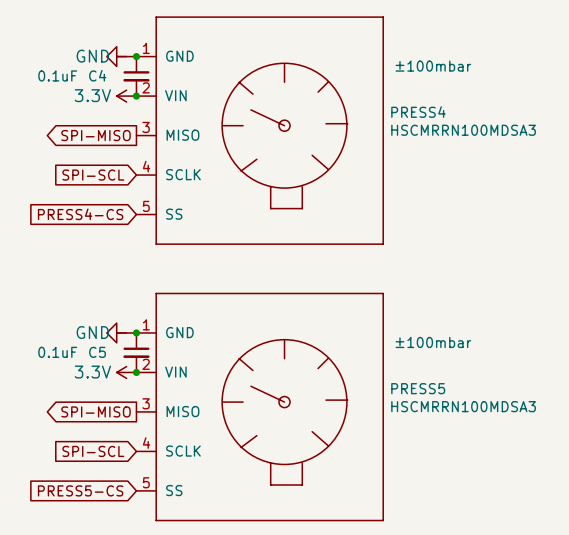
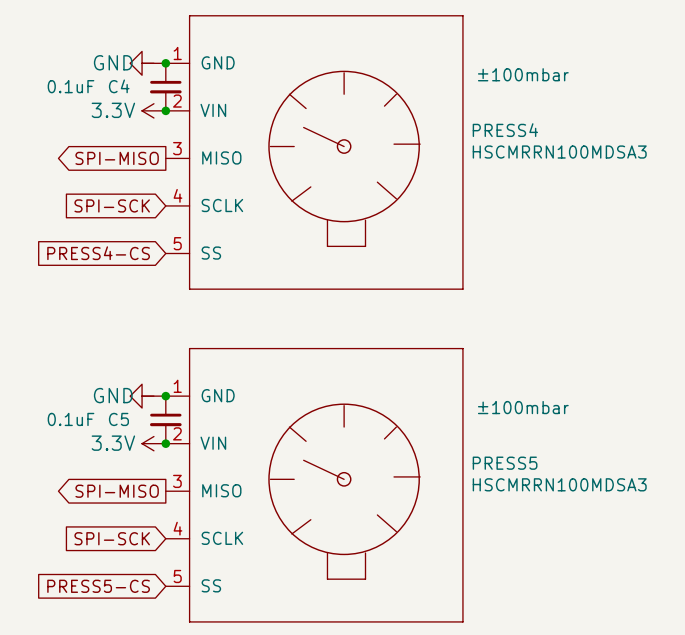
global label: SPI-SCL (93, 175) -> SPI-SCK (112, 205)
global label: SPI-SCL (93, 451) -> SPI-SCK (112, 538)

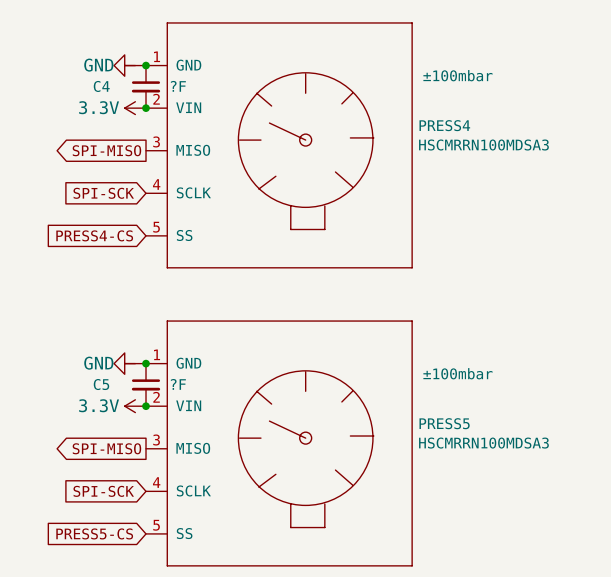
C4 text: 0.1uF (71, 86) -> ?F (178, 86)
C5 text: 0.1uF (71, 419) -> ?F (178, 384)

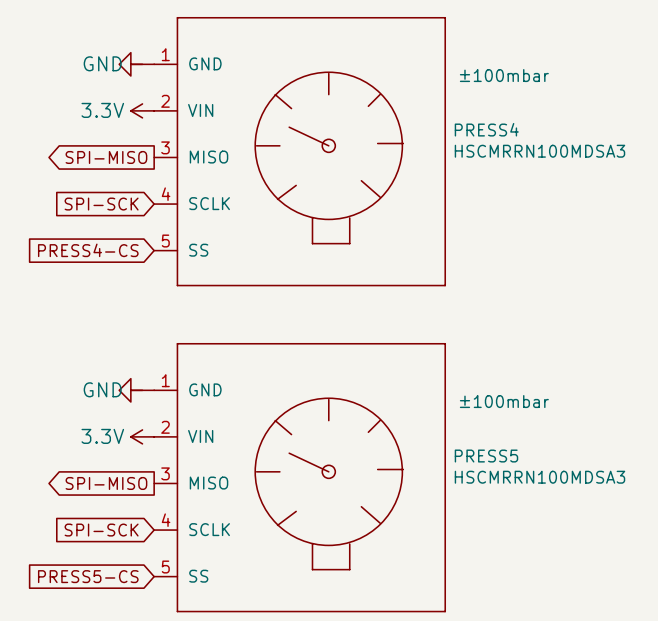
junction: (146, 65) -> none
C4: (146, 86) -> none
junction: (146, 108) -> none
junction: (146, 363) -> none
C5: (146, 384) -> none
junction: (146, 406) -> none

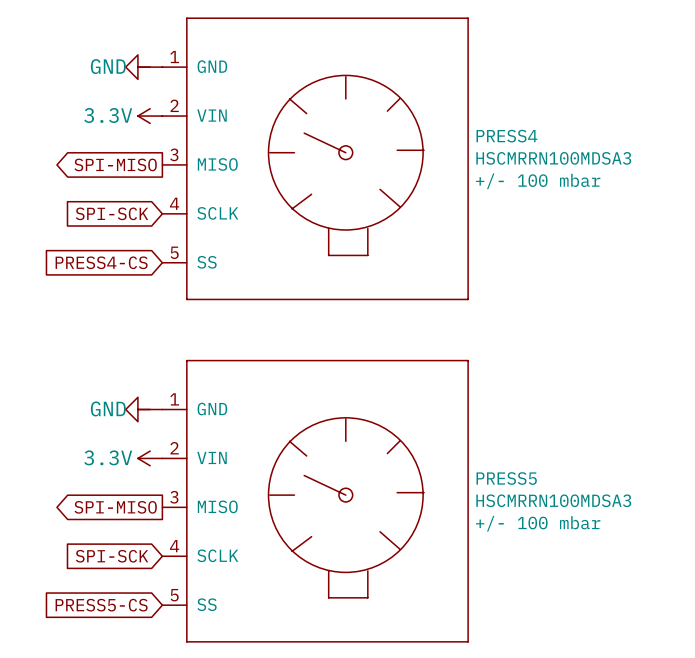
PRESS4 text: ±100mbar (504, 75) -> +/- 100 mbar (538, 181)
PRESS5 text: ±100mbar (504, 401) -> +/- 100 mbar (538, 523)

